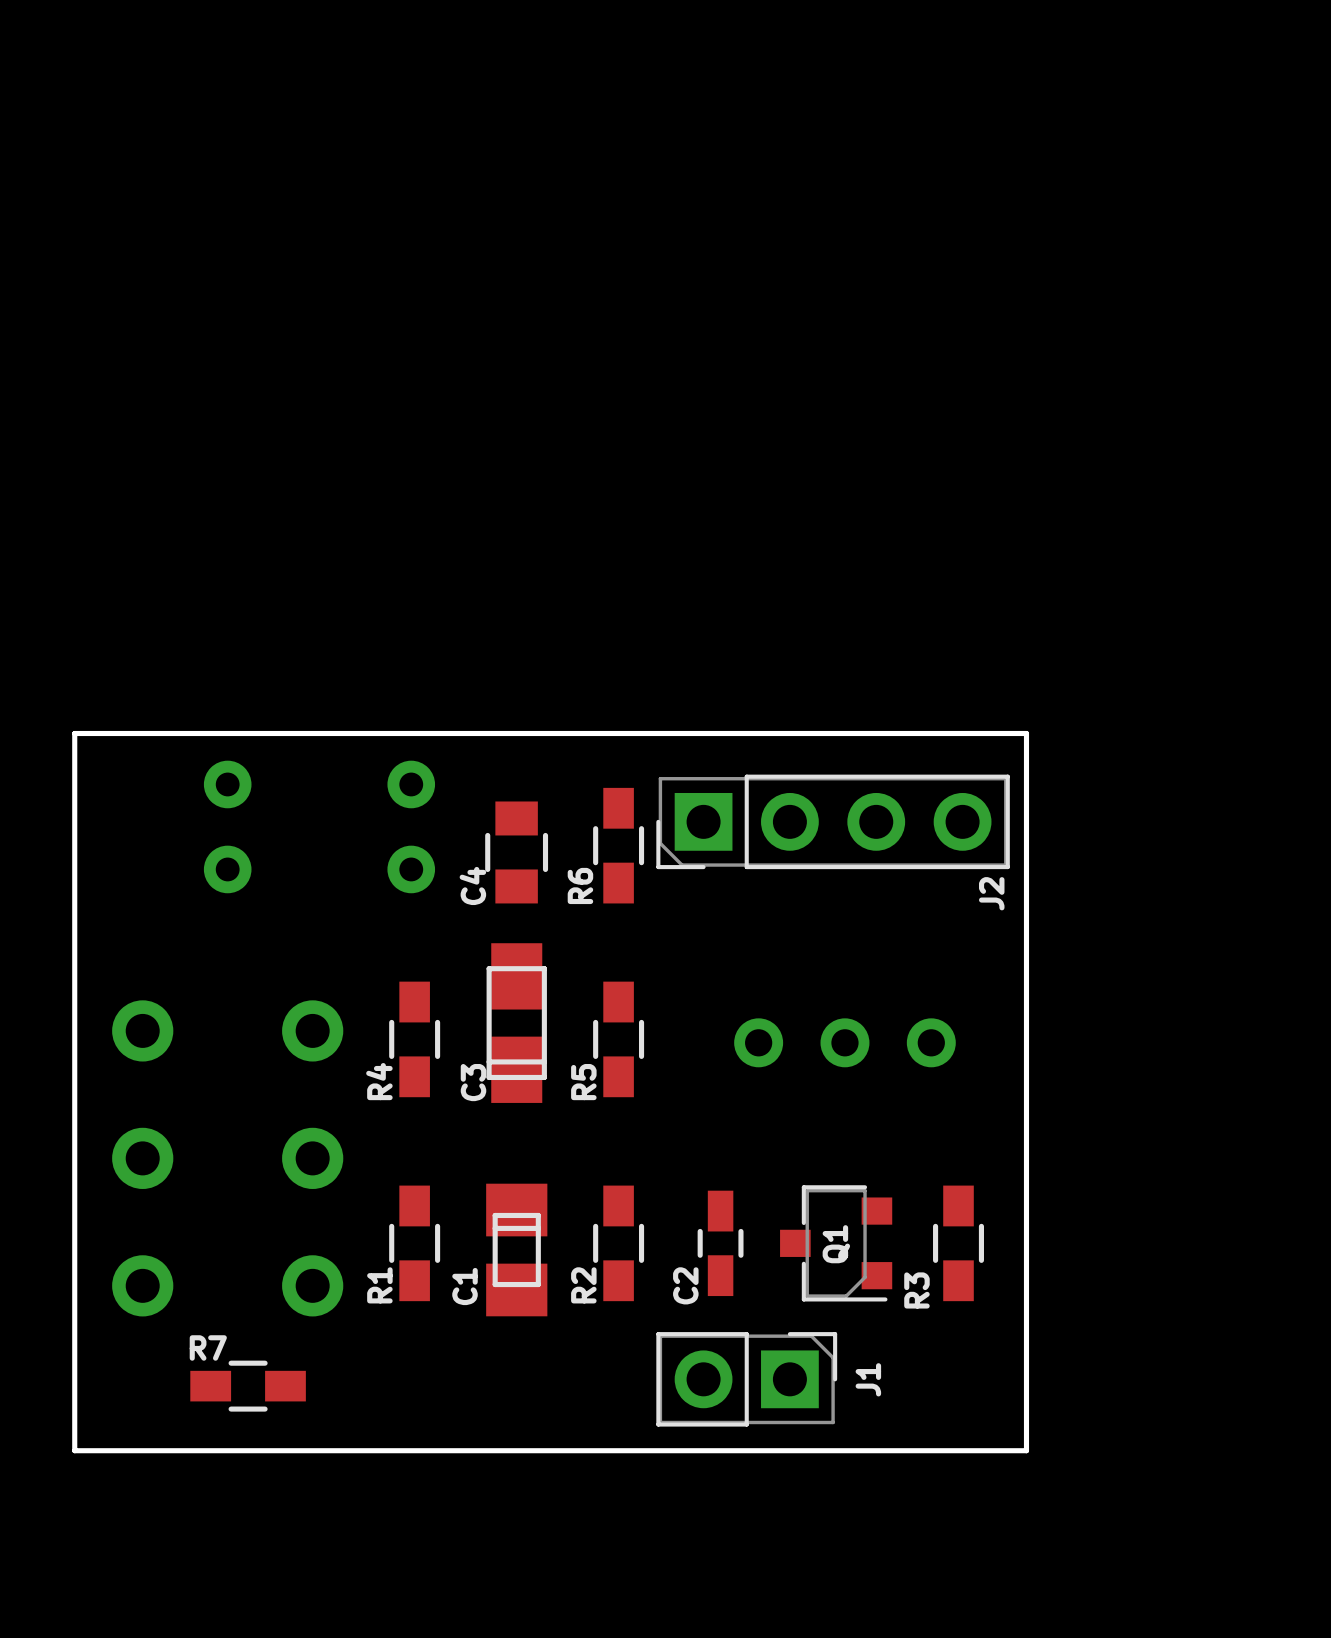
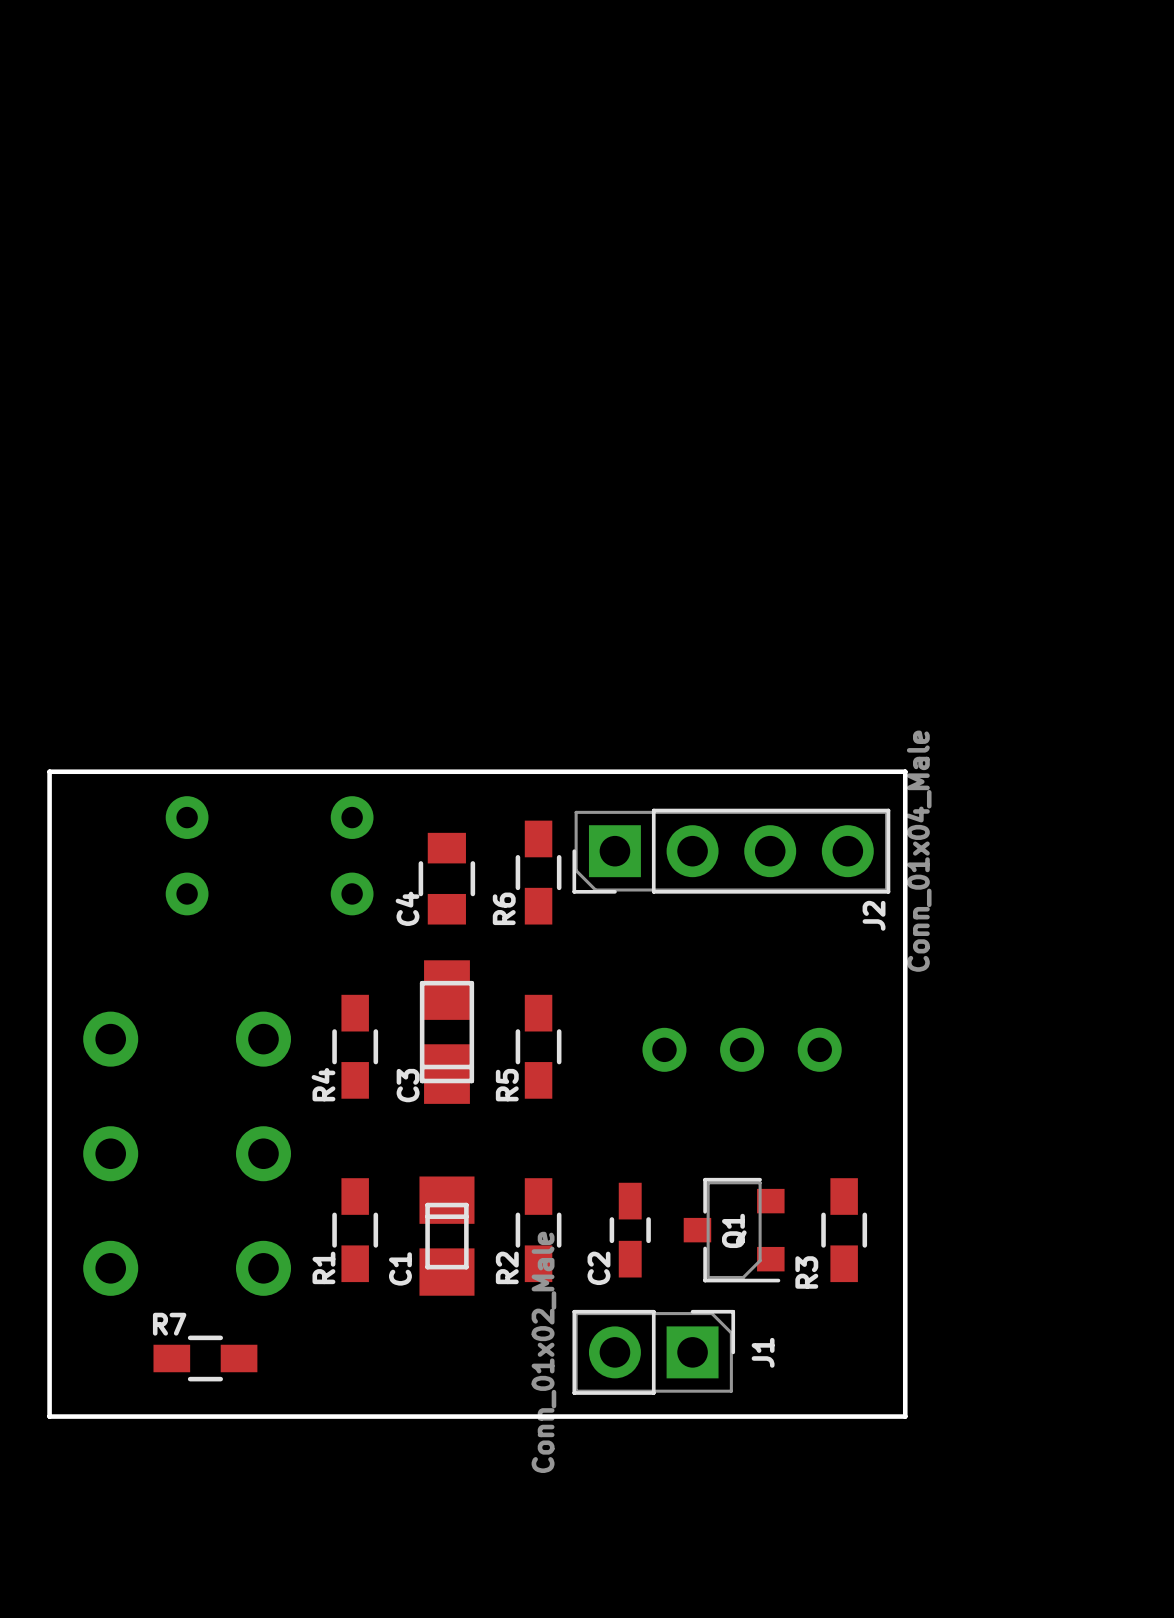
J2 value: none -> Conn_01x04_Male (918, 851)
J1 value: none -> Conn_01x02_Male (543, 1352)

